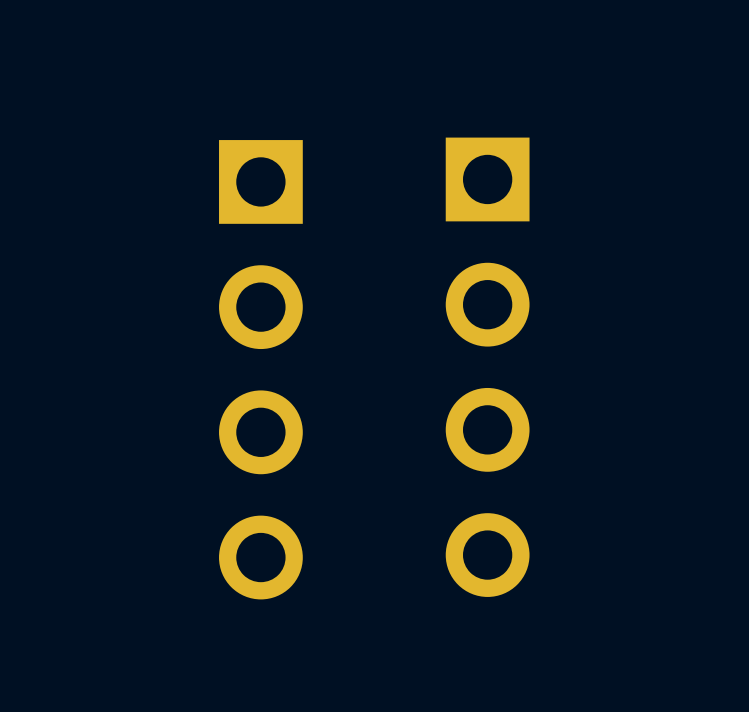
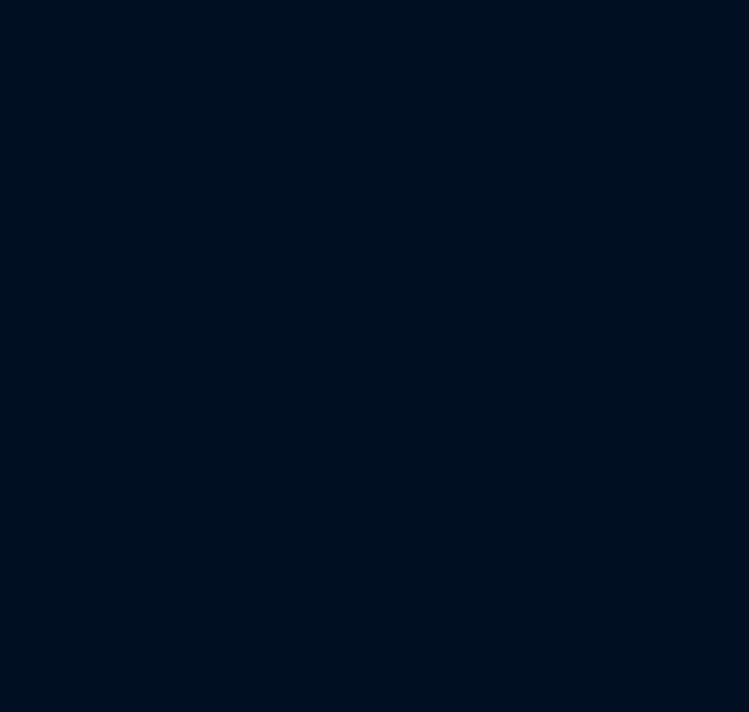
part: (487, 367) -> none
part: (260, 369) -> none

